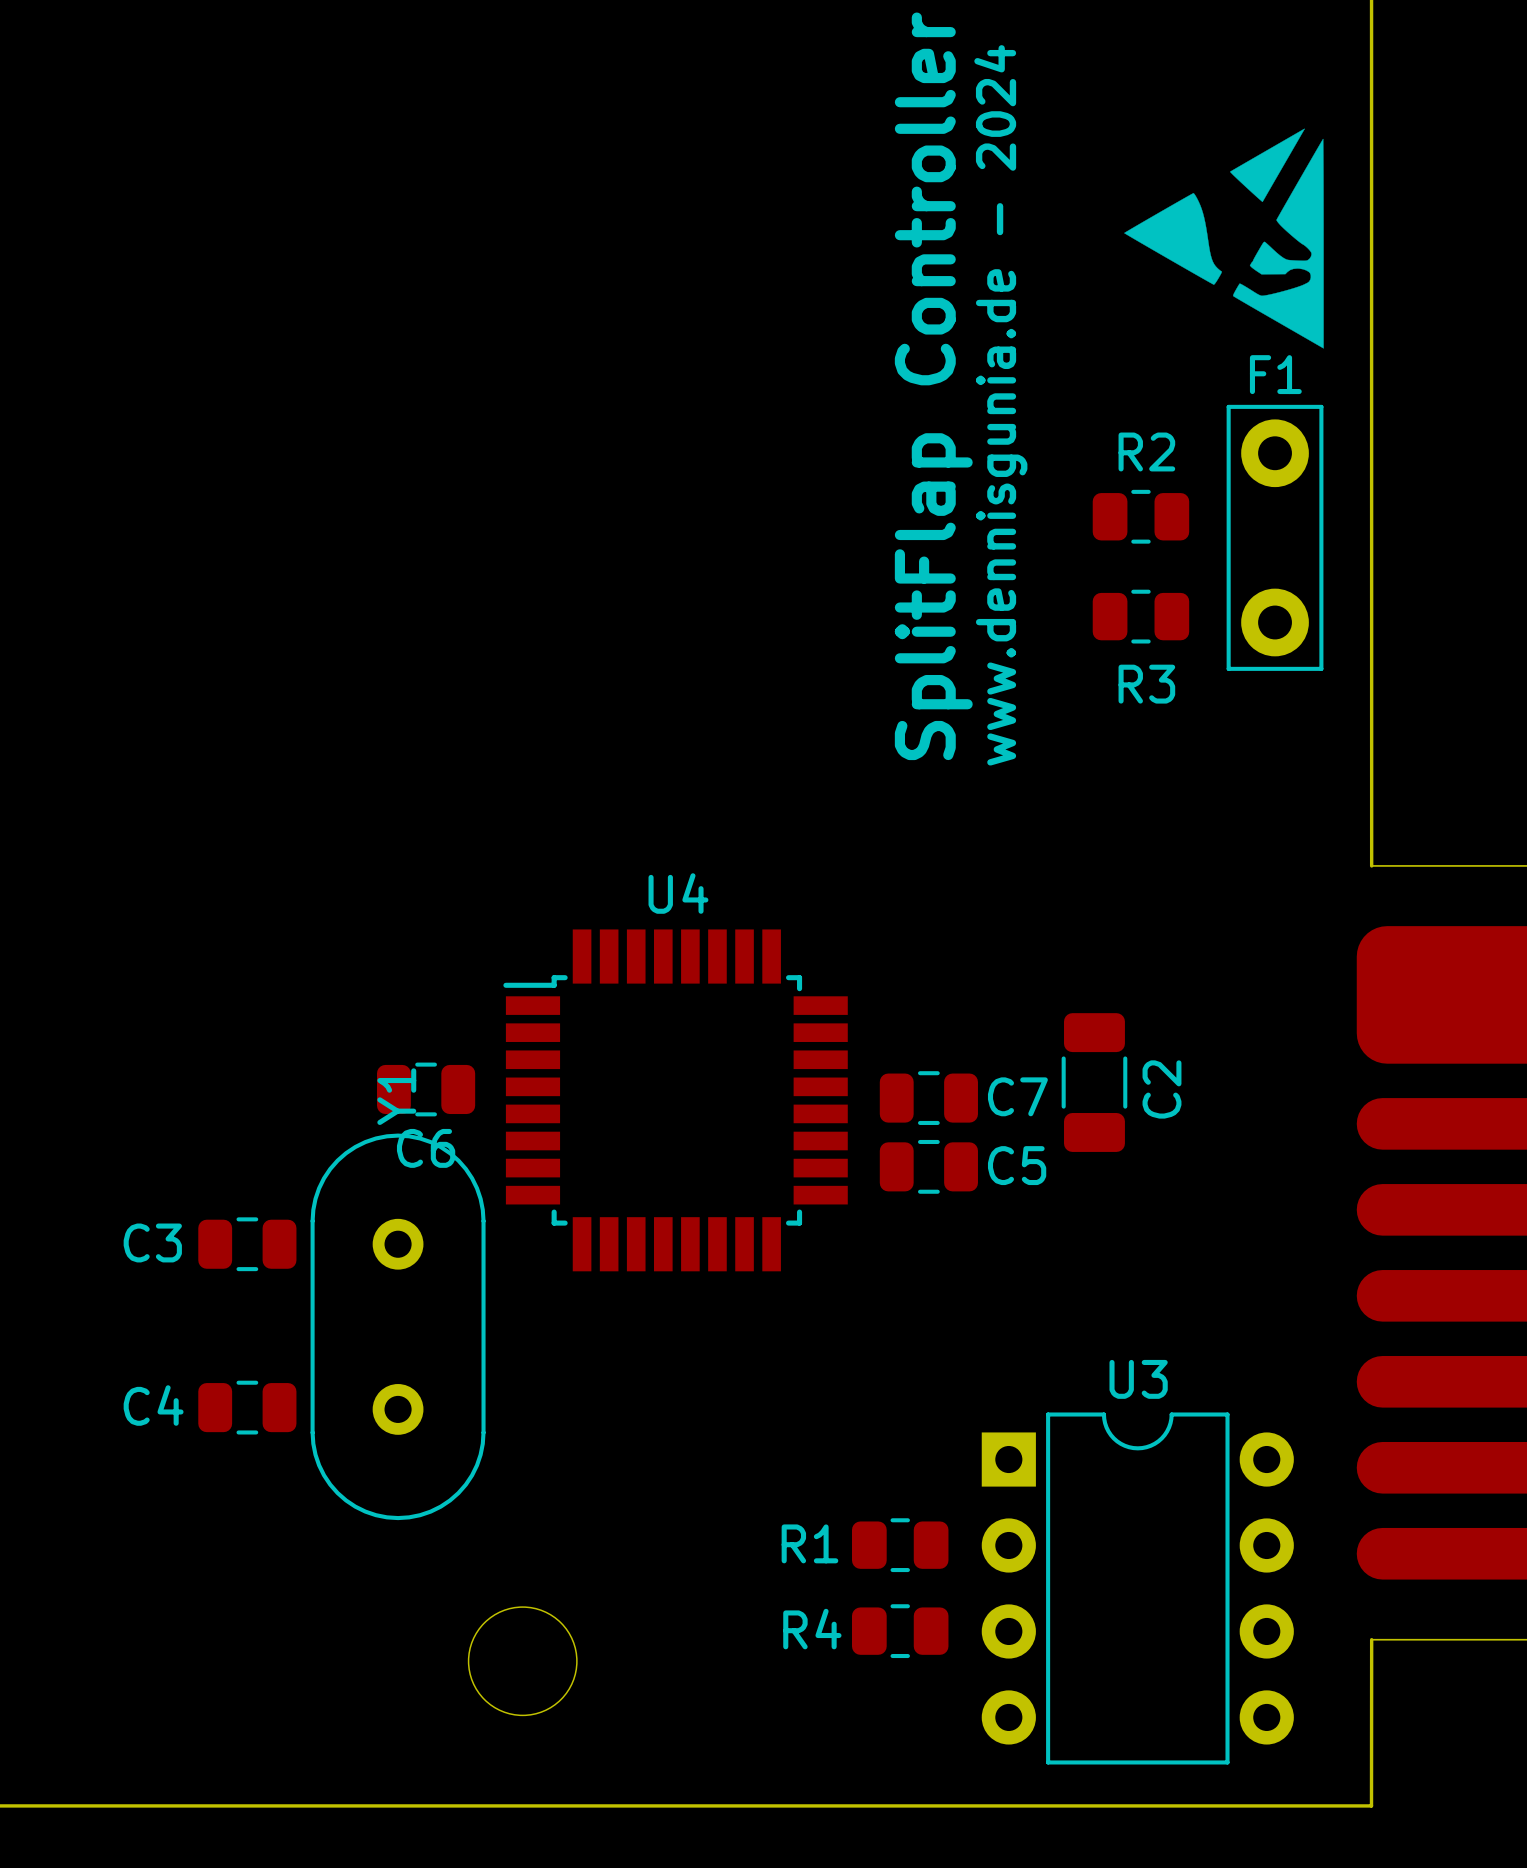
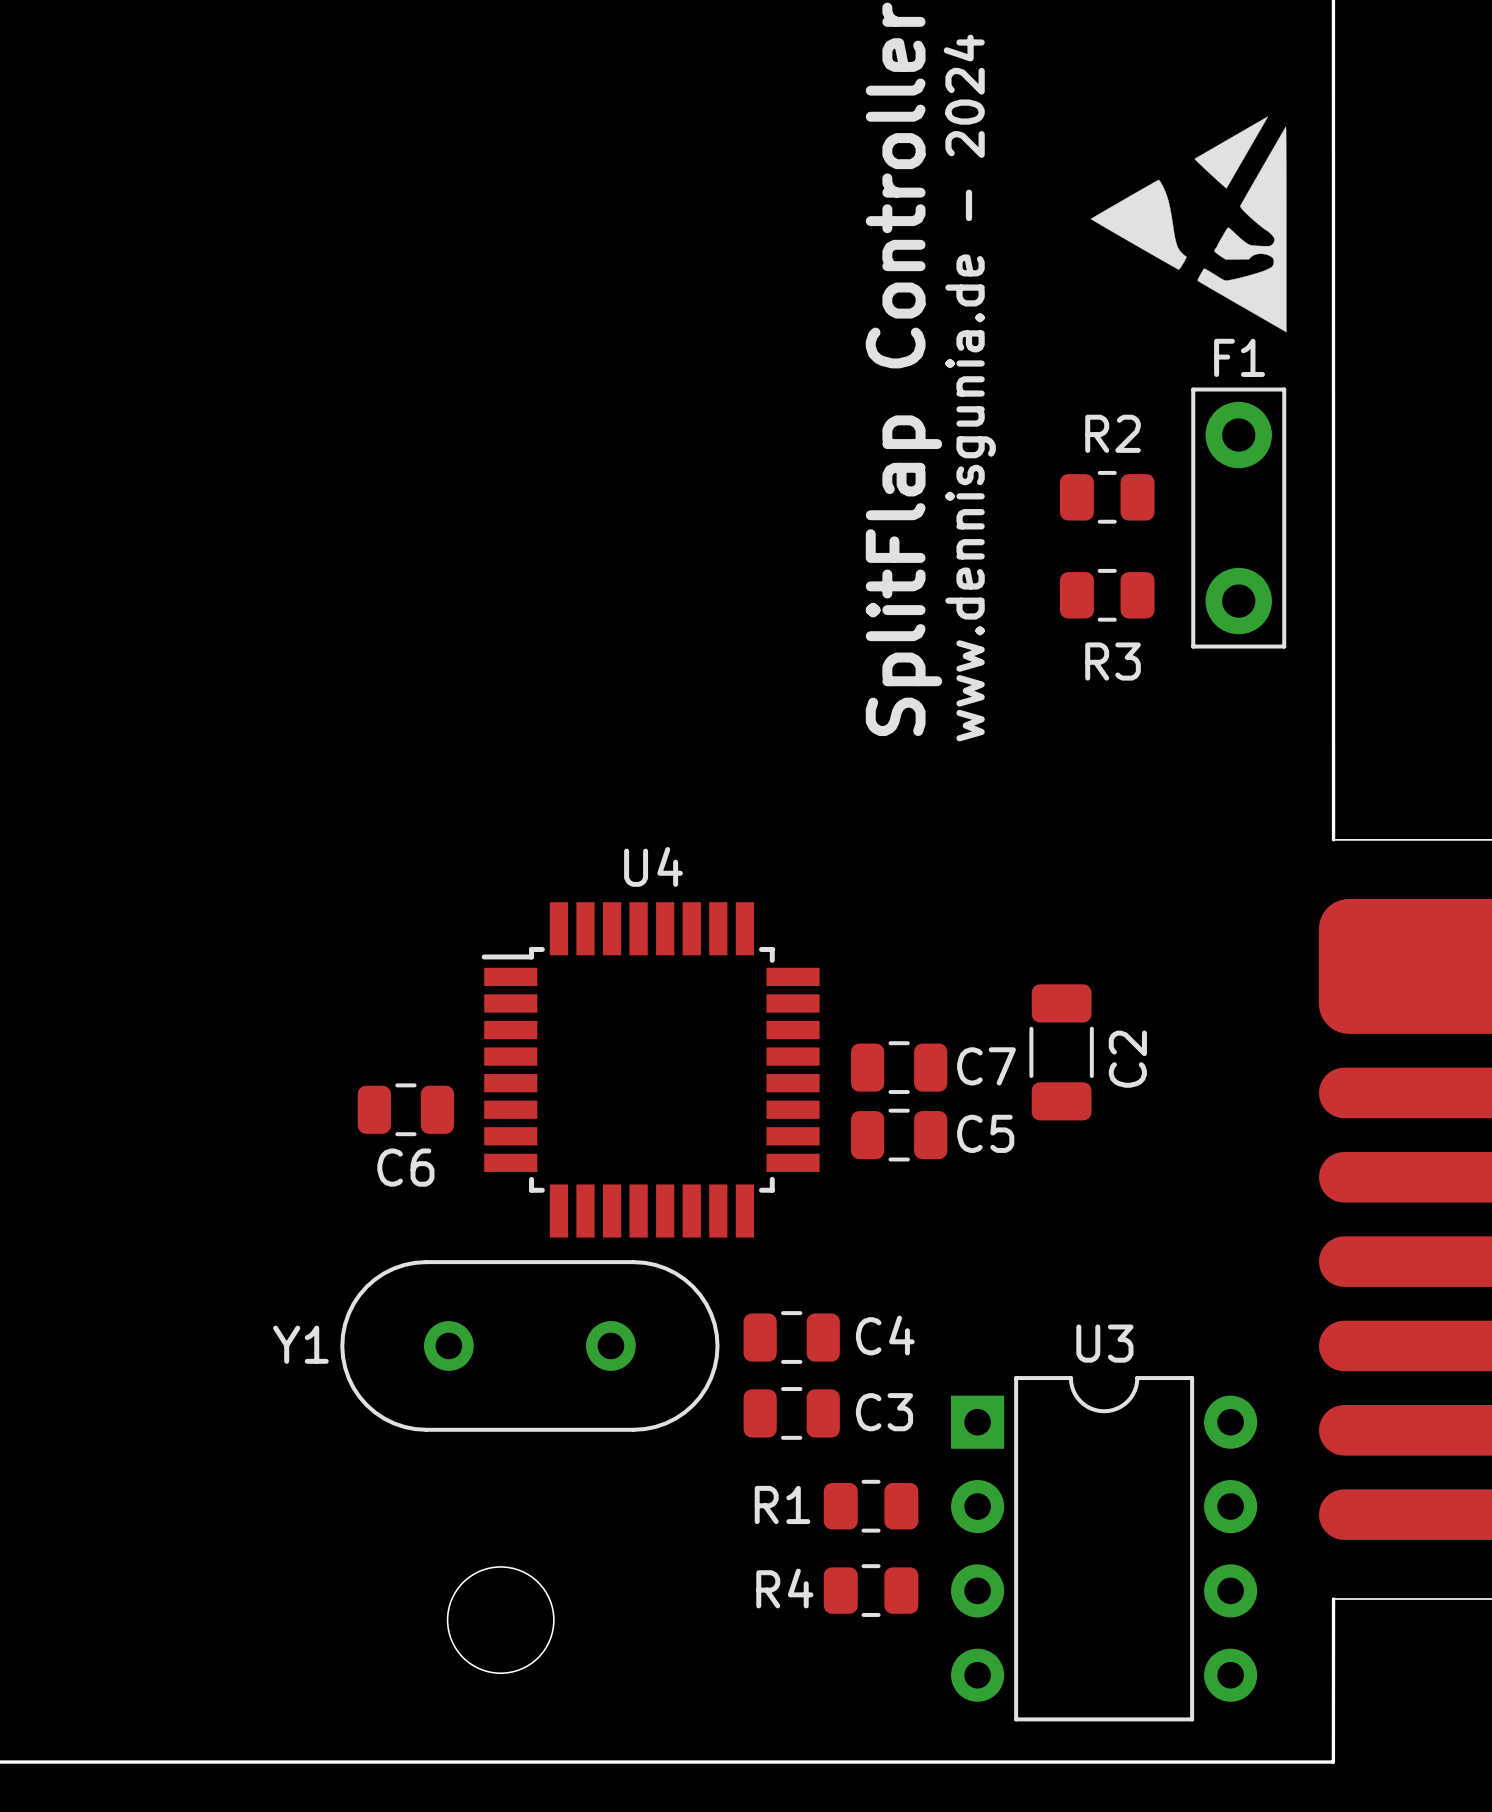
C6 position: (426, 1089) -> (405, 1109)
Y1 name position: Y1 (396, 1096) -> Y1 (300, 1344)
C3 name position: C3 (152, 1242) -> C3 (884, 1412)
C3 position: (247, 1244) -> (791, 1413)
Y1 rotation: 0° (398, 1326) -> 90° clockwise (529, 1345)
C4 name position: C4 (153, 1405) -> C4 (885, 1335)
C4 position: (247, 1407) -> (791, 1337)

